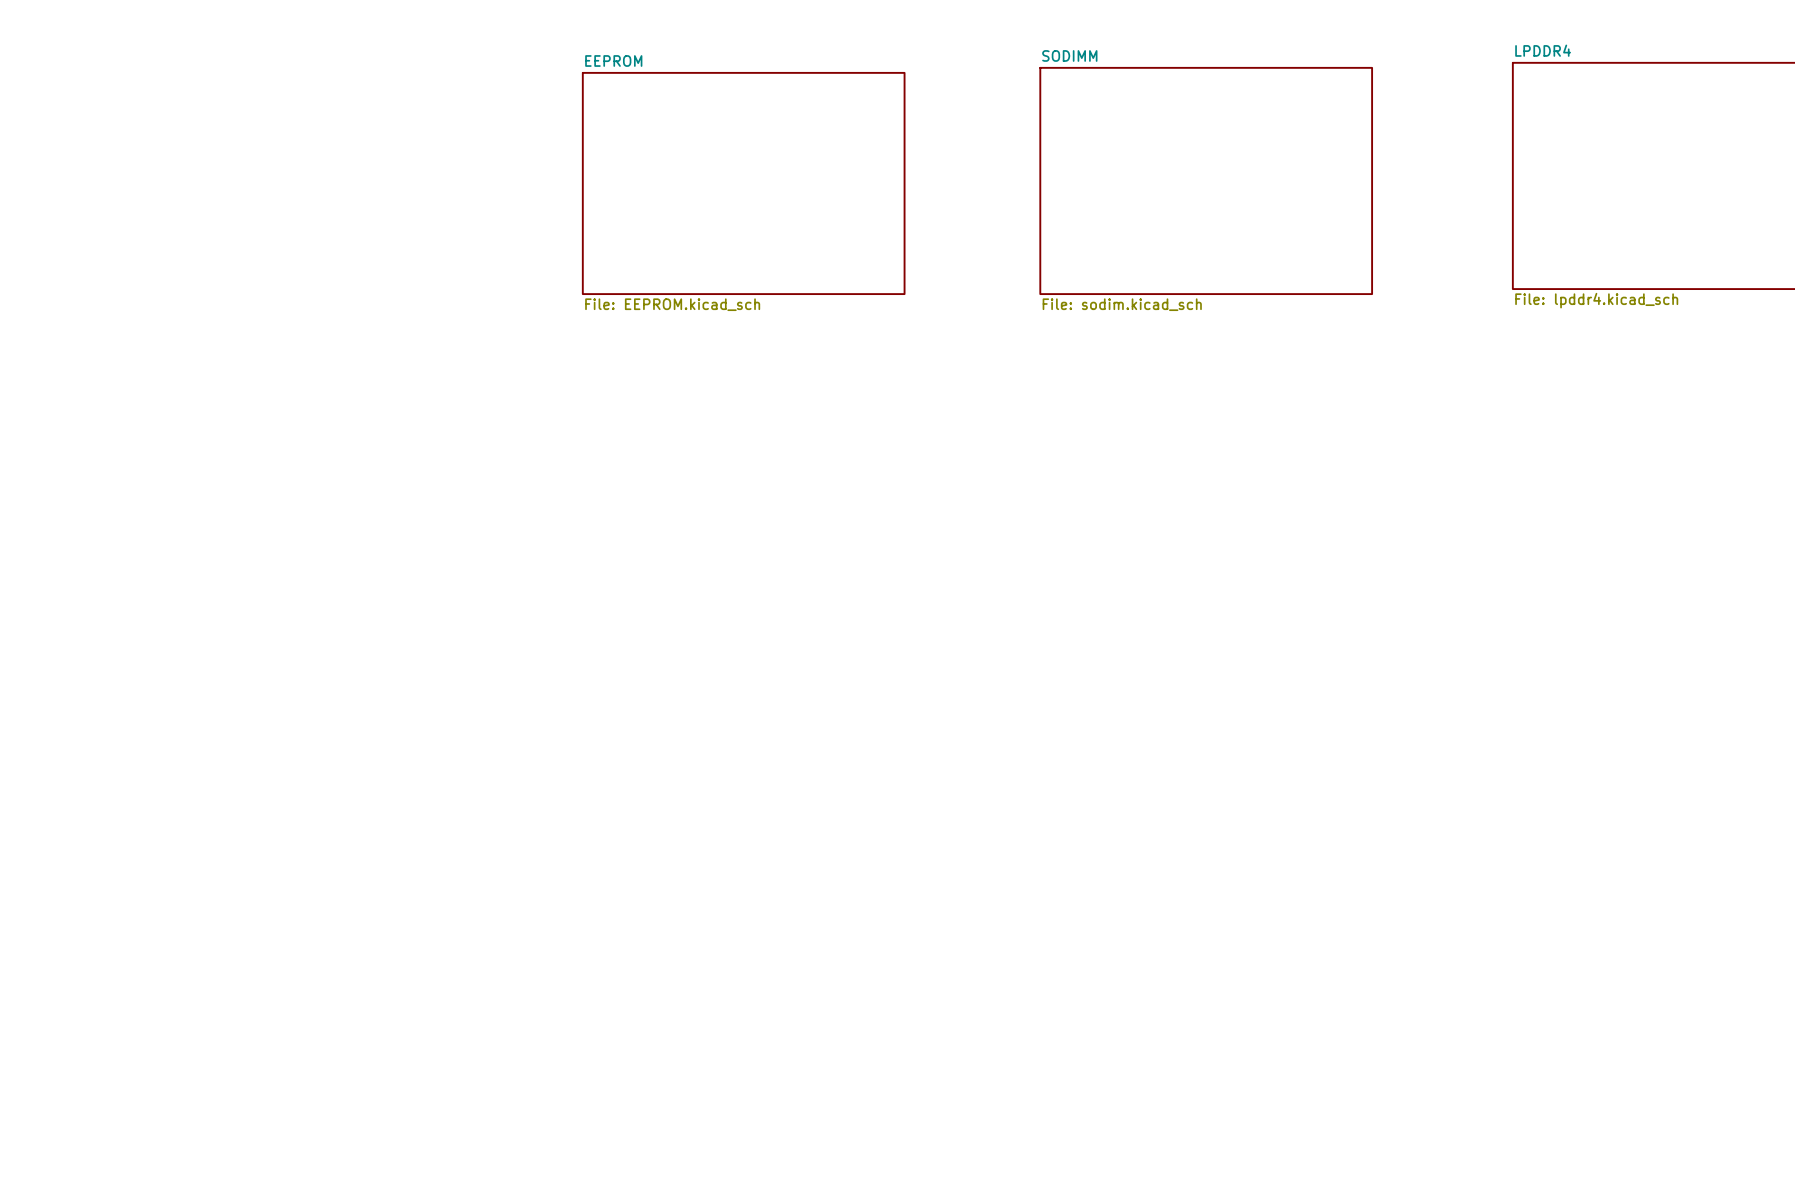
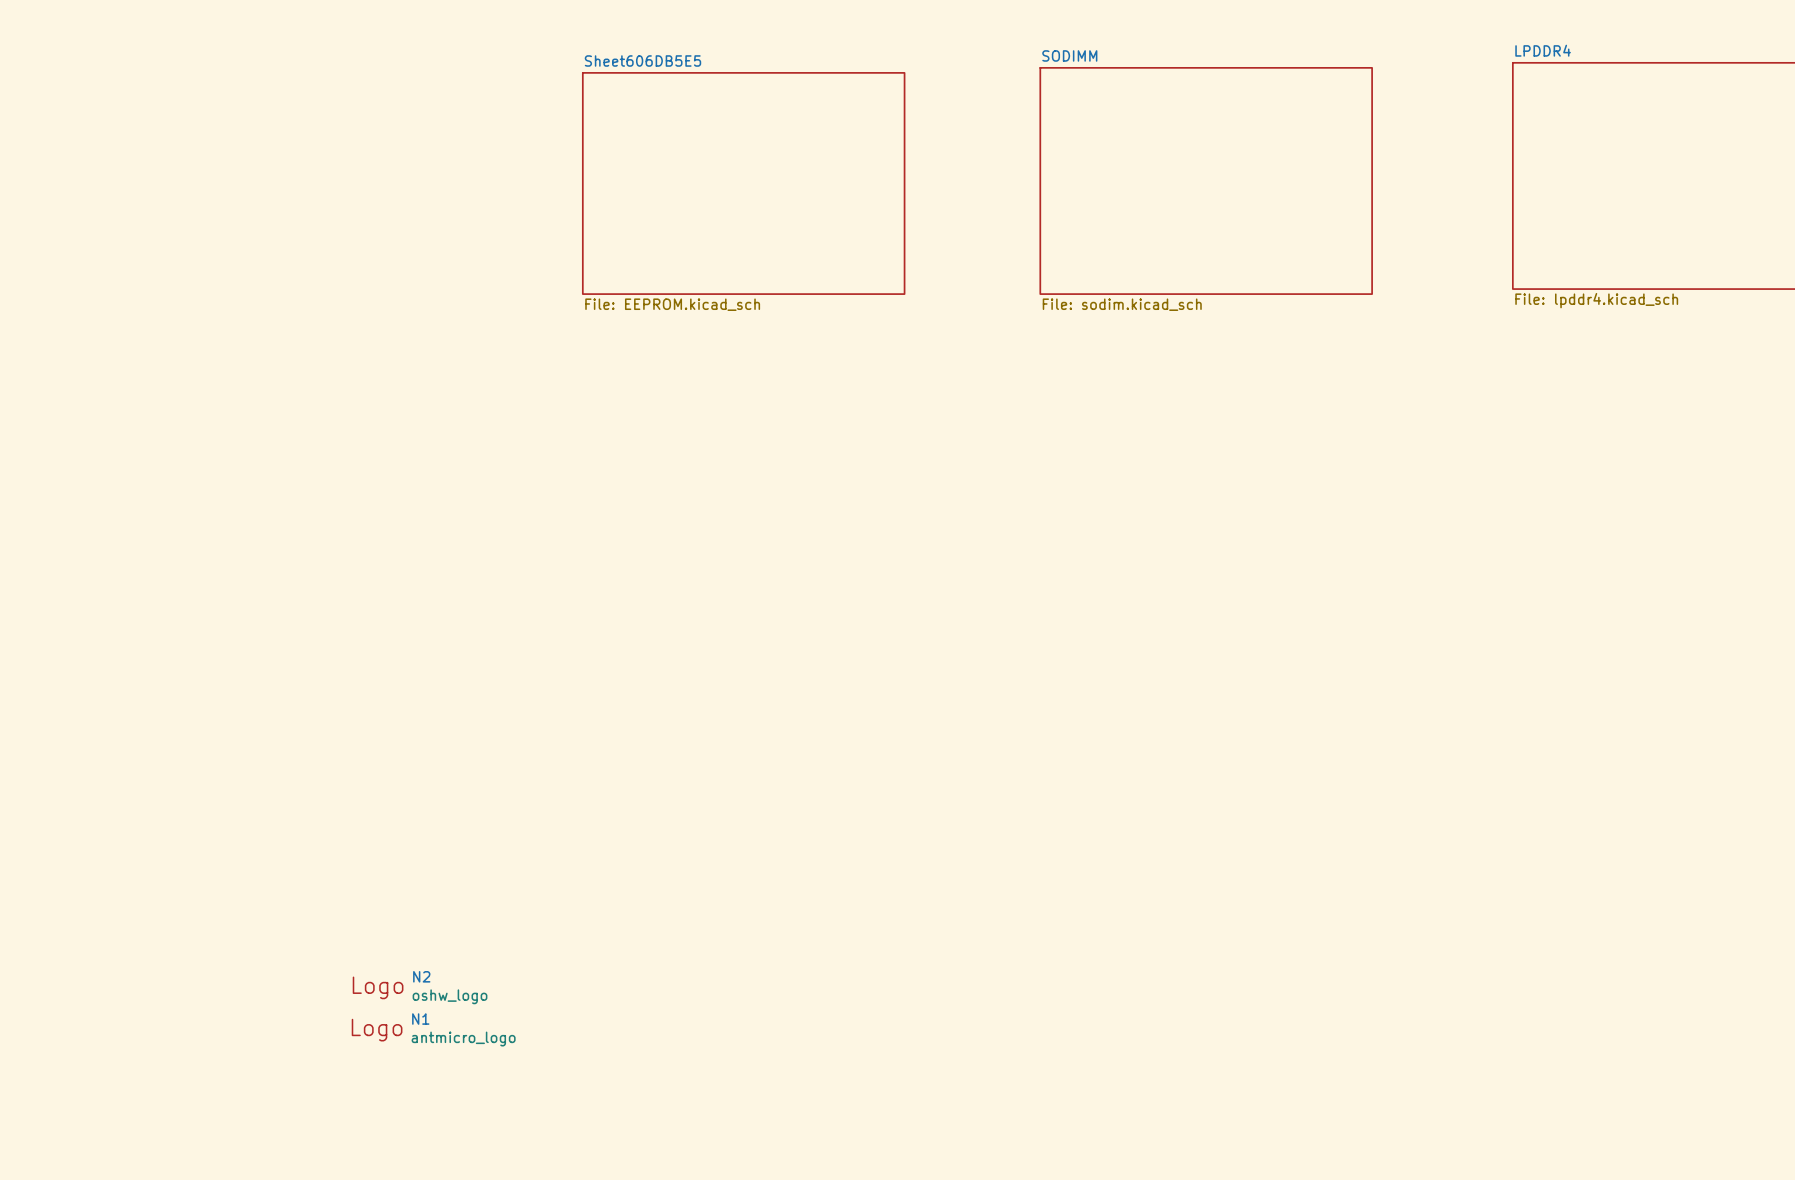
sheet EEPROM name: EEPROM (613, 60) -> Sheet606DB5E5 (642, 60)
N2: none -> oshw_logo (420, 987)
N1: none -> antmicro_logo (433, 1029)

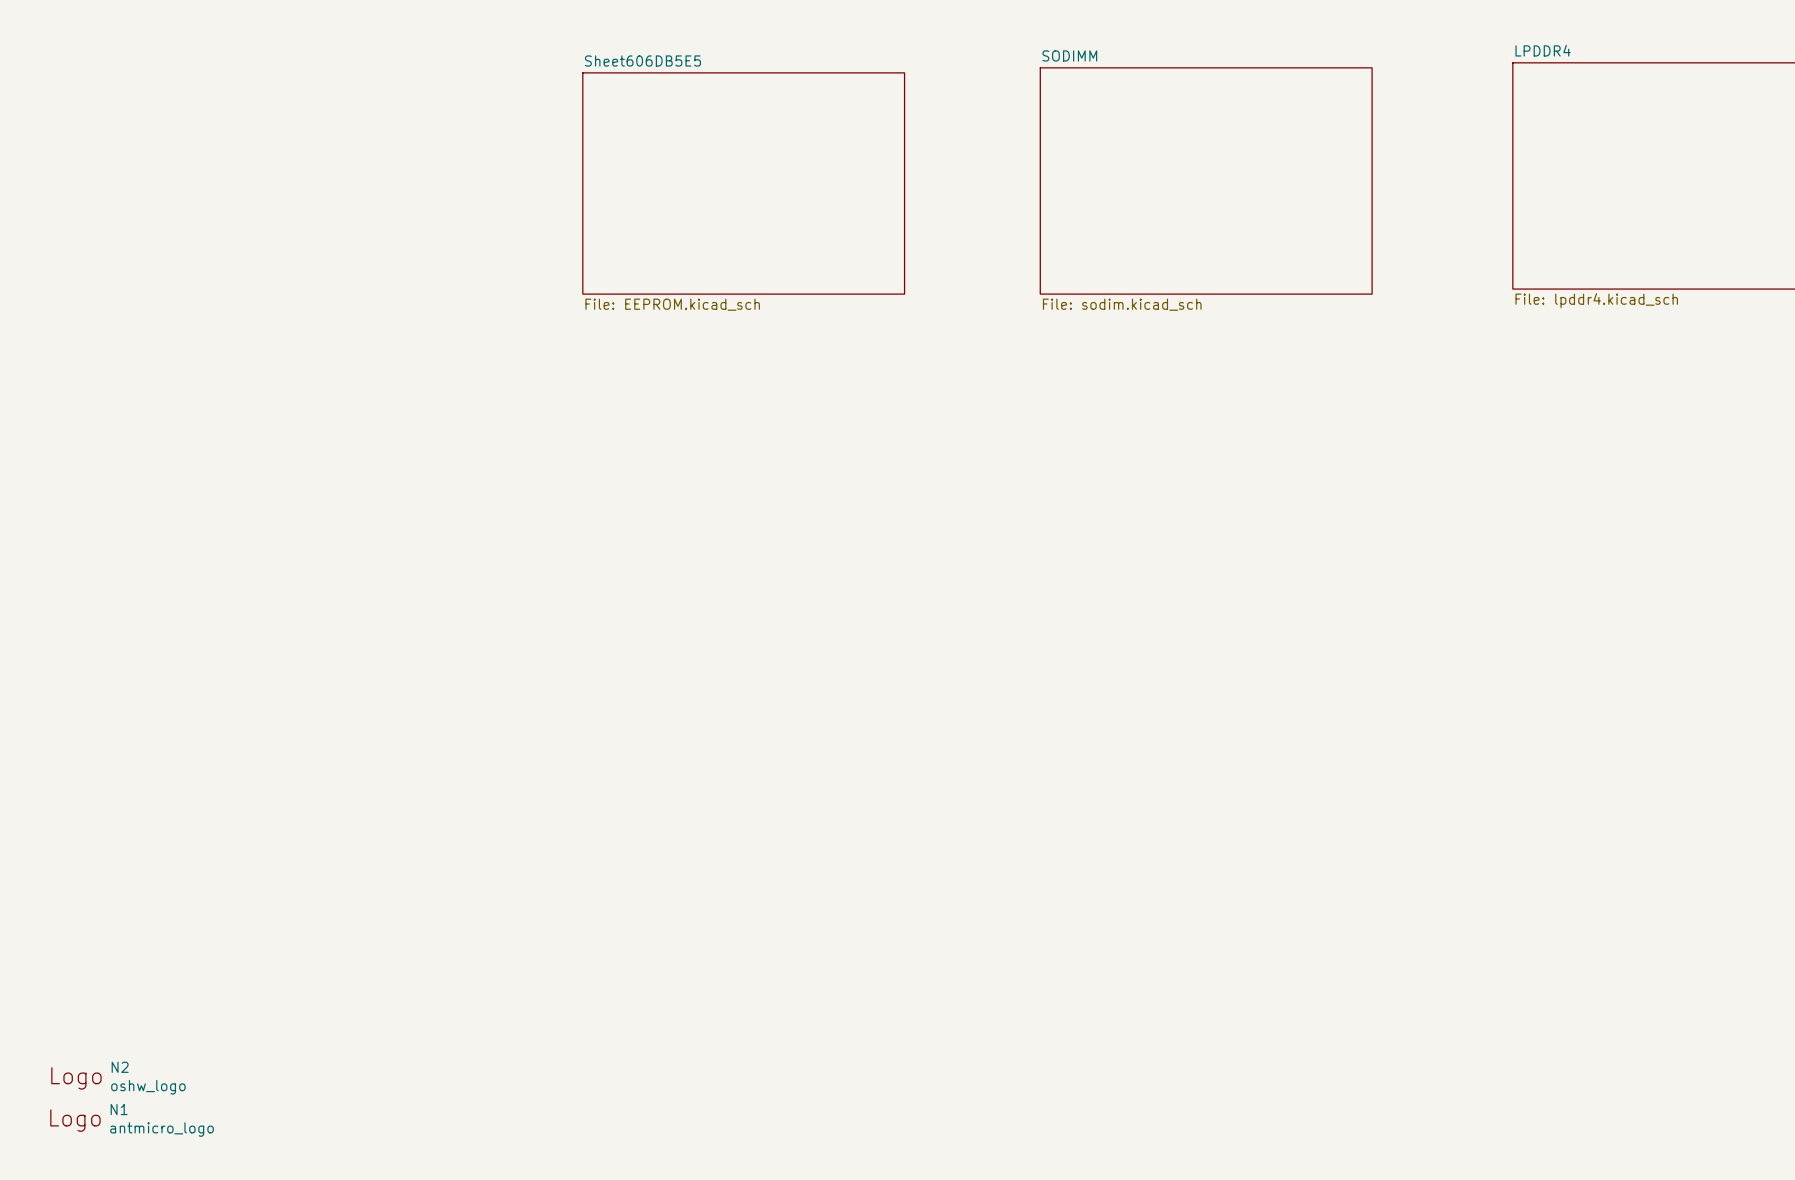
N2 position: (420, 987) -> (118, 1078)
N1 position: (433, 1029) -> (132, 1120)

